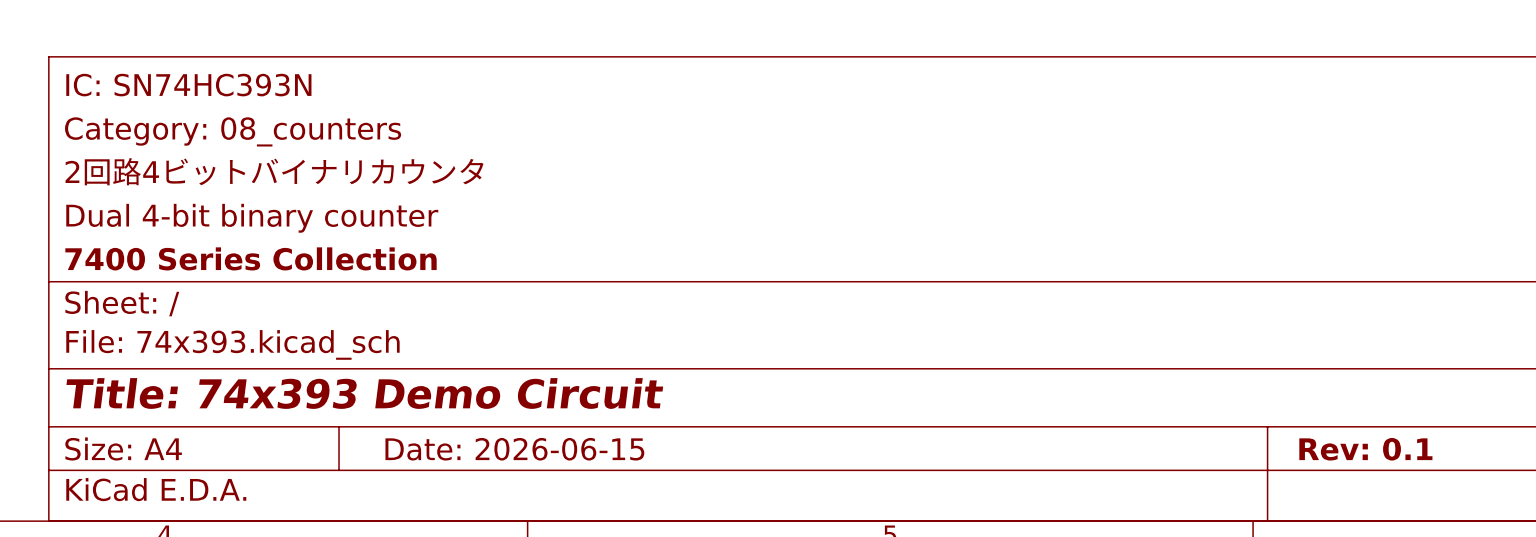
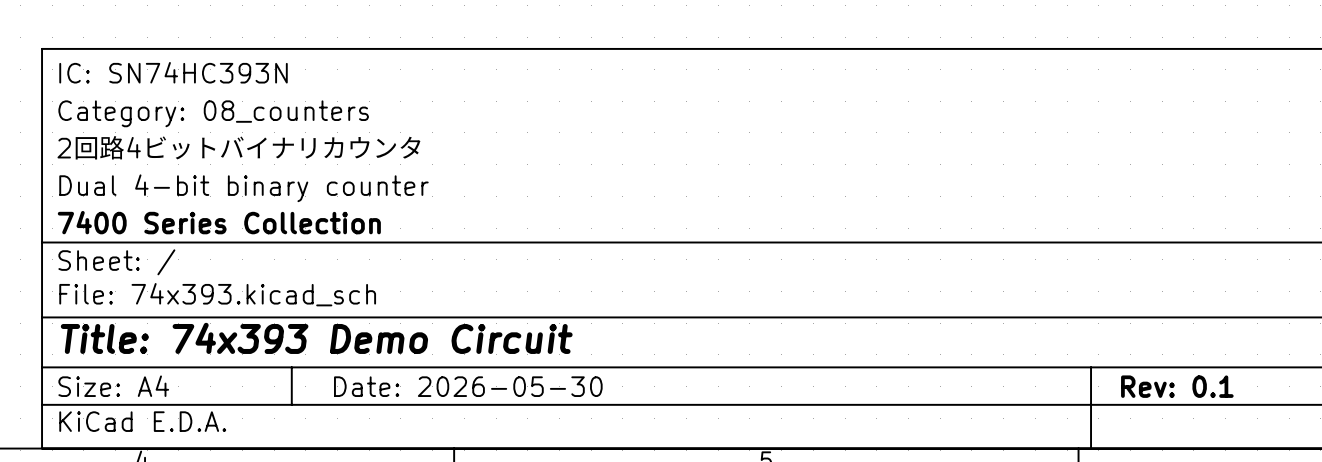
title block: Date: 2026-06-15 (514, 449) -> Date: 2026-05-30 (468, 386)

